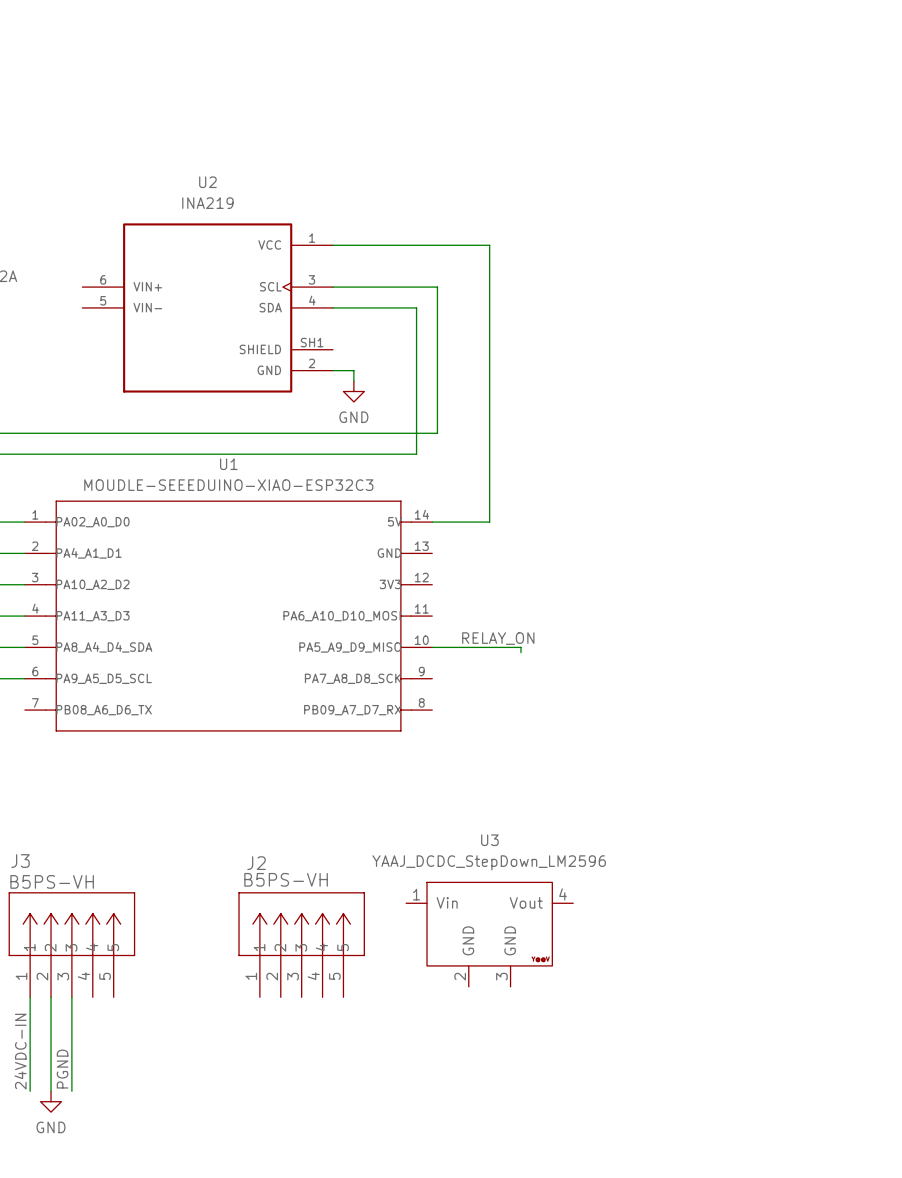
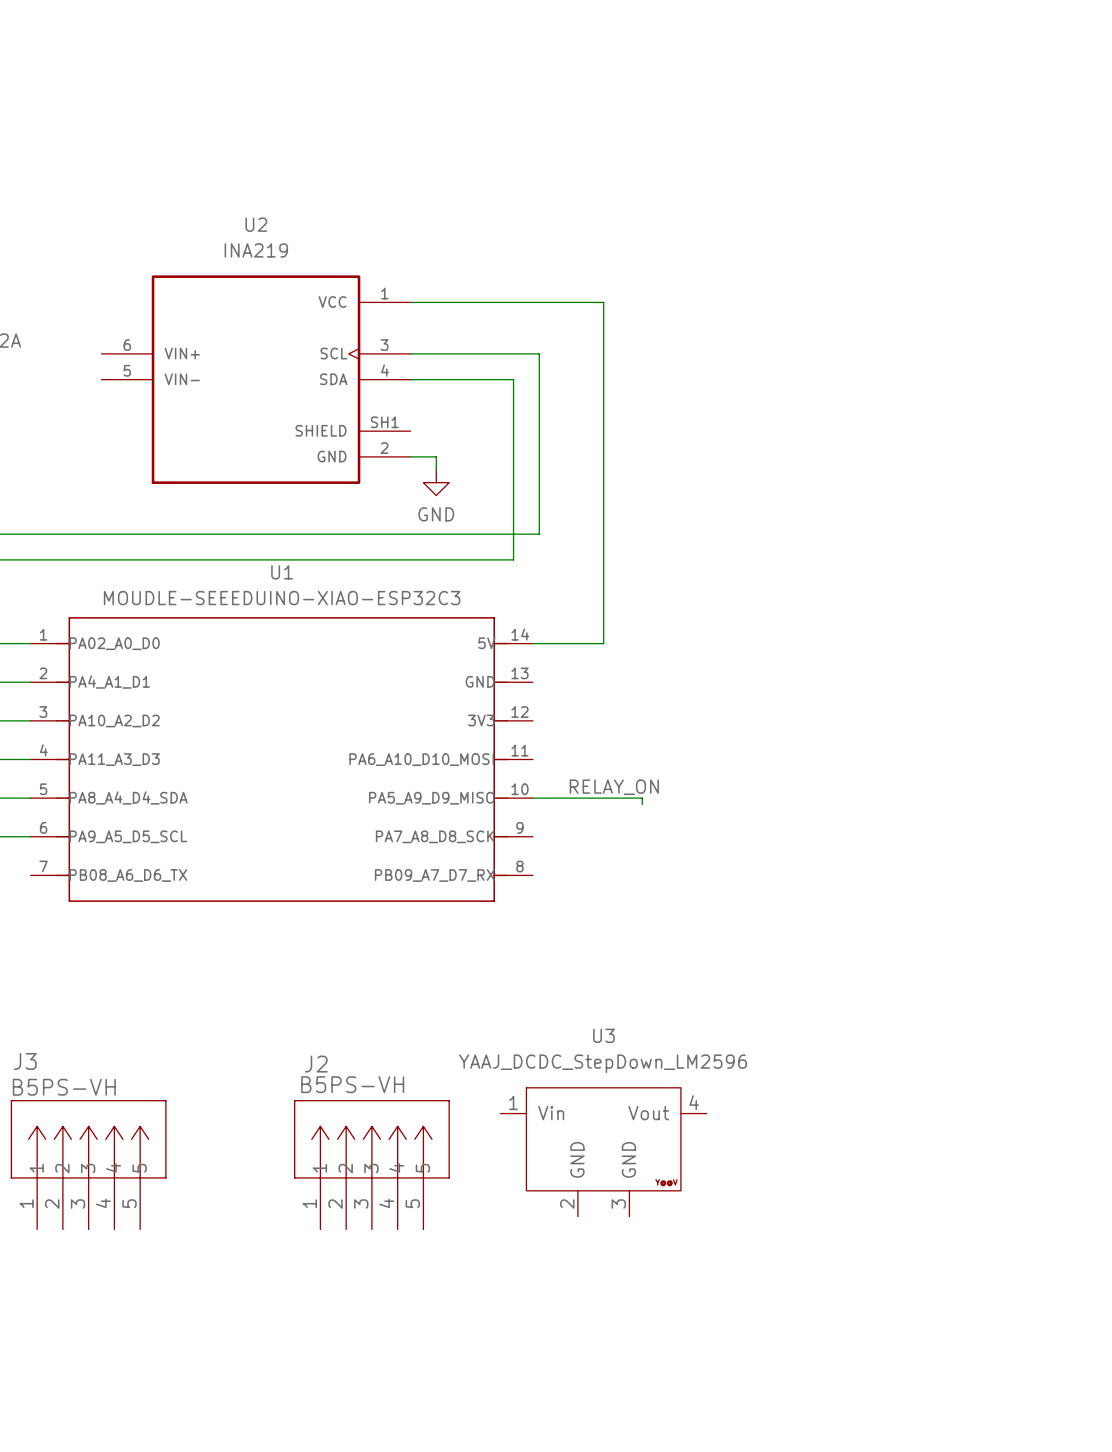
wire: (30, 997) (30, 1091) -> none
wire: (51, 997) (51, 1091) -> none
wire: (71, 997) (71, 1091) -> none
label: 24VDC-IN (20, 1051) -> none
label: PGND (62, 1069) -> none
power symbol: GND (51, 1101) -> none

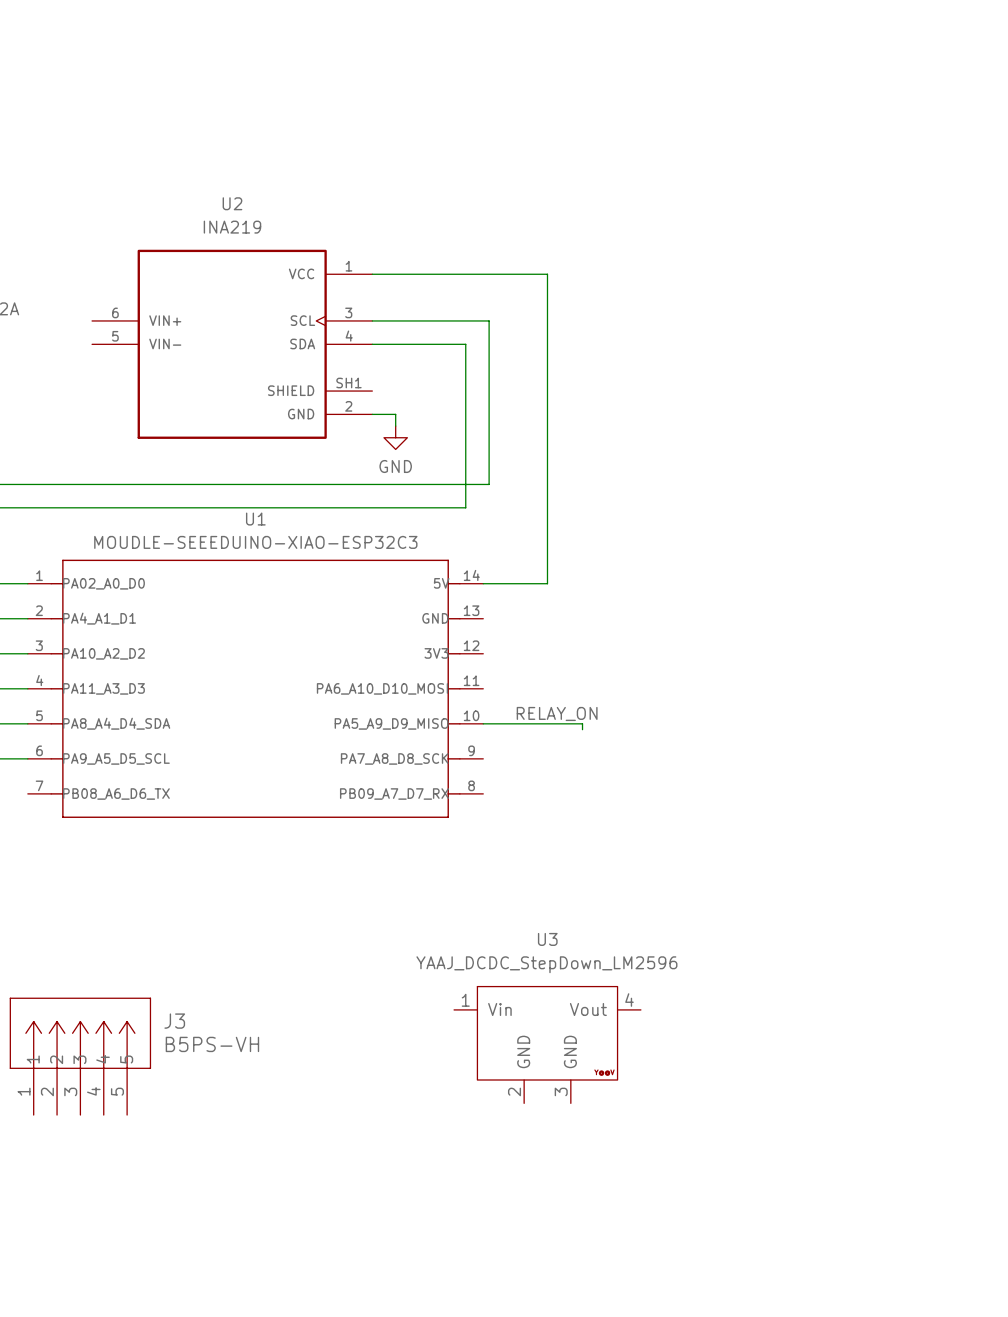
J3 name position: J3 (25, 1061) -> J3 (174, 1021)
J3 value position: B5PS-VH (64, 1087) -> B5PS-VH (212, 1044)
J2: B5PS-VH (371, 1164) -> none

